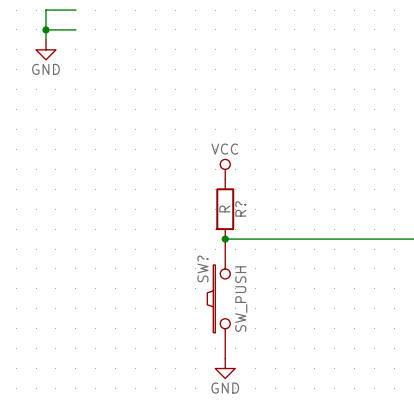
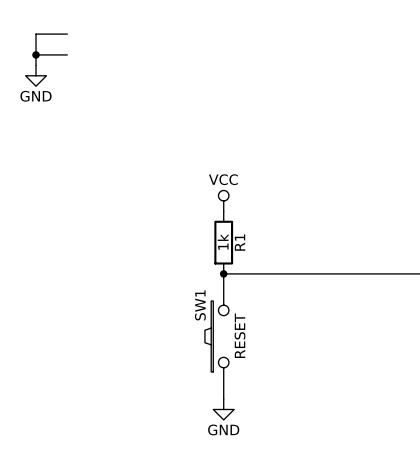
R? value: R (224, 208) -> 1k (223, 241)
R? name: R? (240, 208) -> R1 (240, 242)
SW? name: SW? (202, 268) -> SW1 (200, 305)
SW? value: SW_PUSH (241, 299) -> RESET (240, 335)

